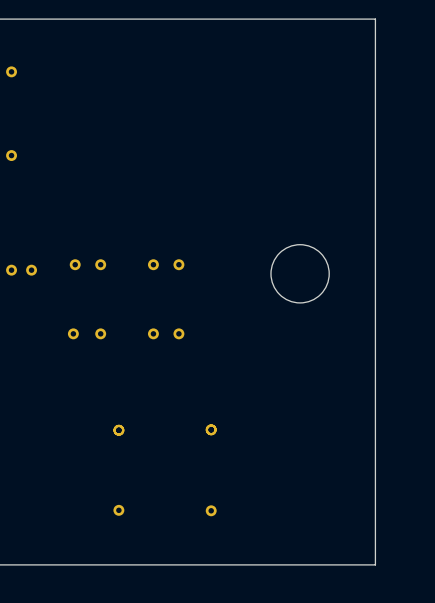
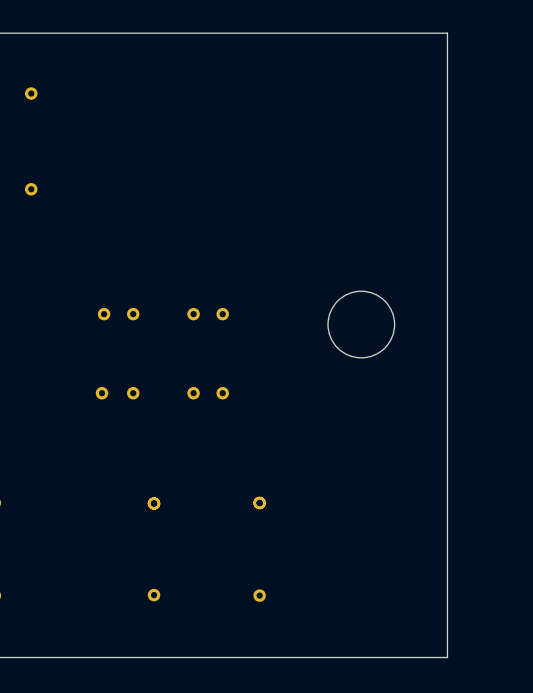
part: (11, 270) -> none
part: (31, 270) -> none

